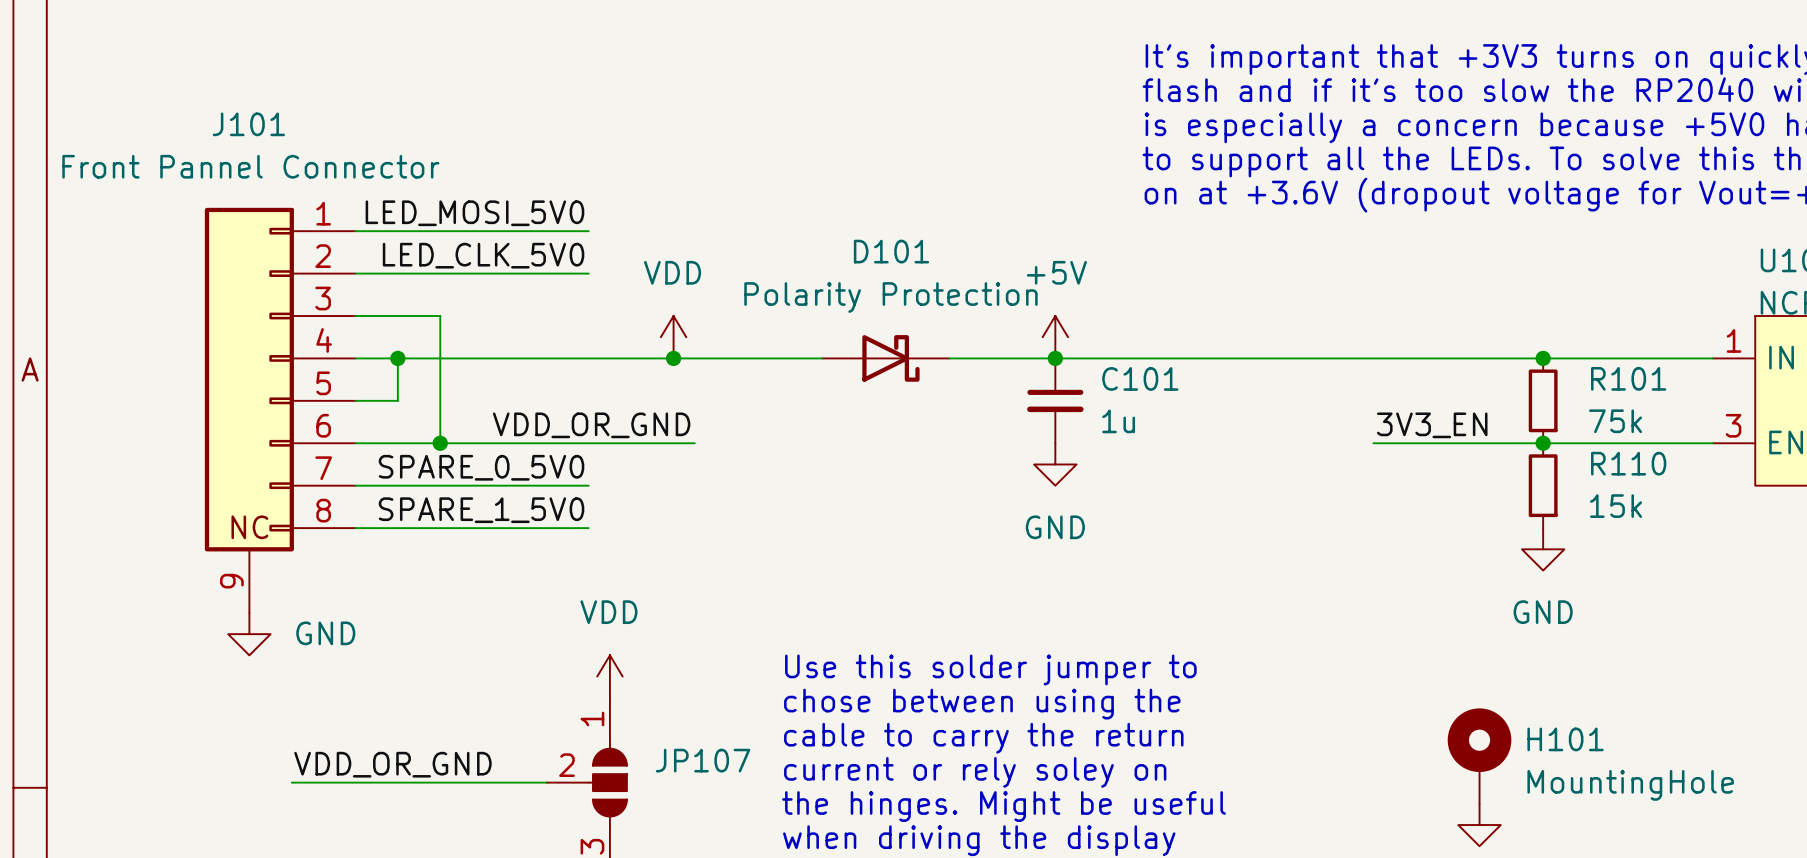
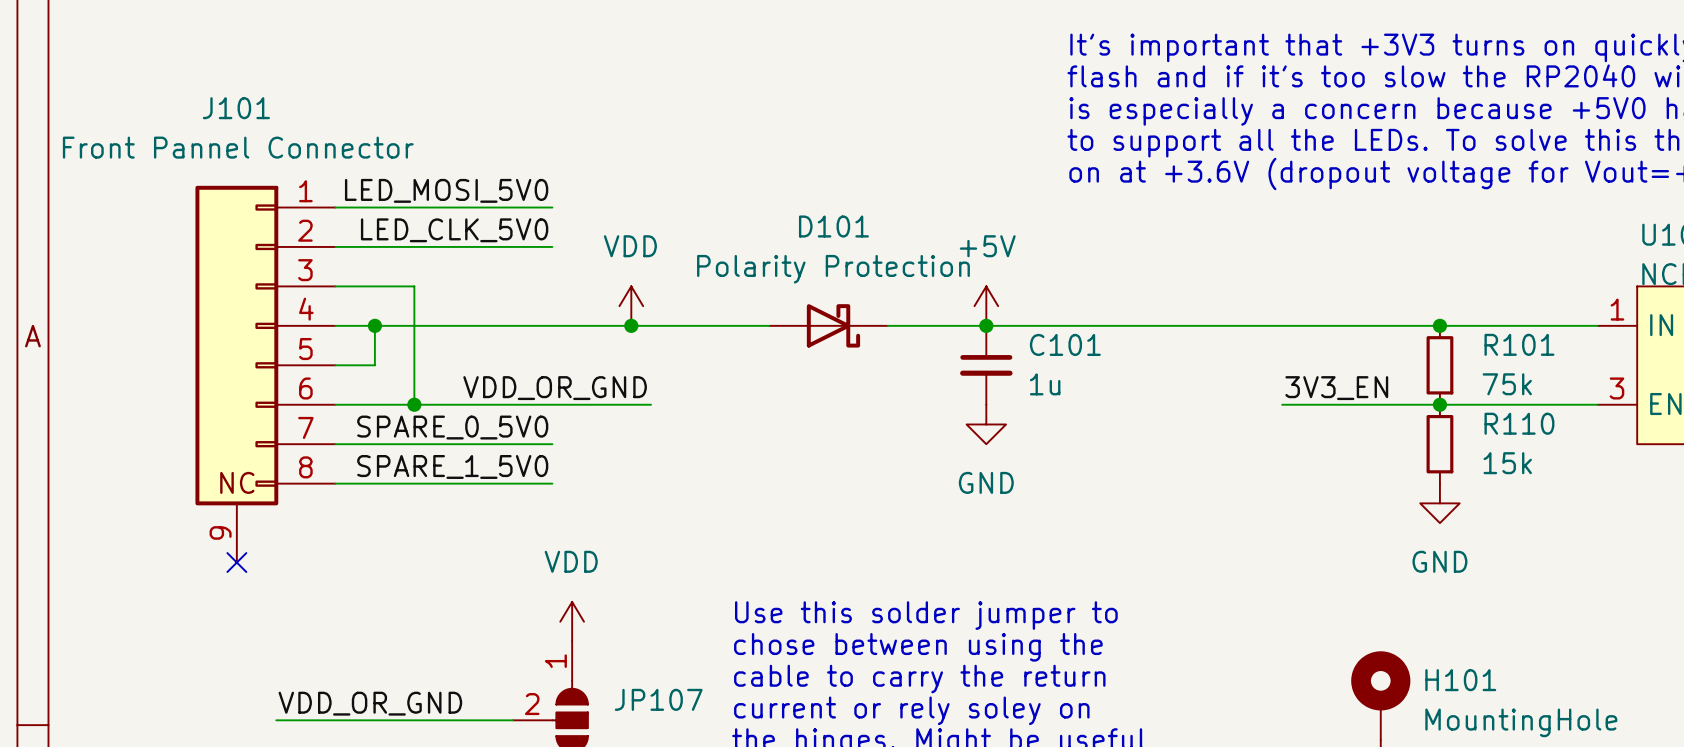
no-connect mark: none -> (236, 562)
power symbol: GND (249, 634) -> none

